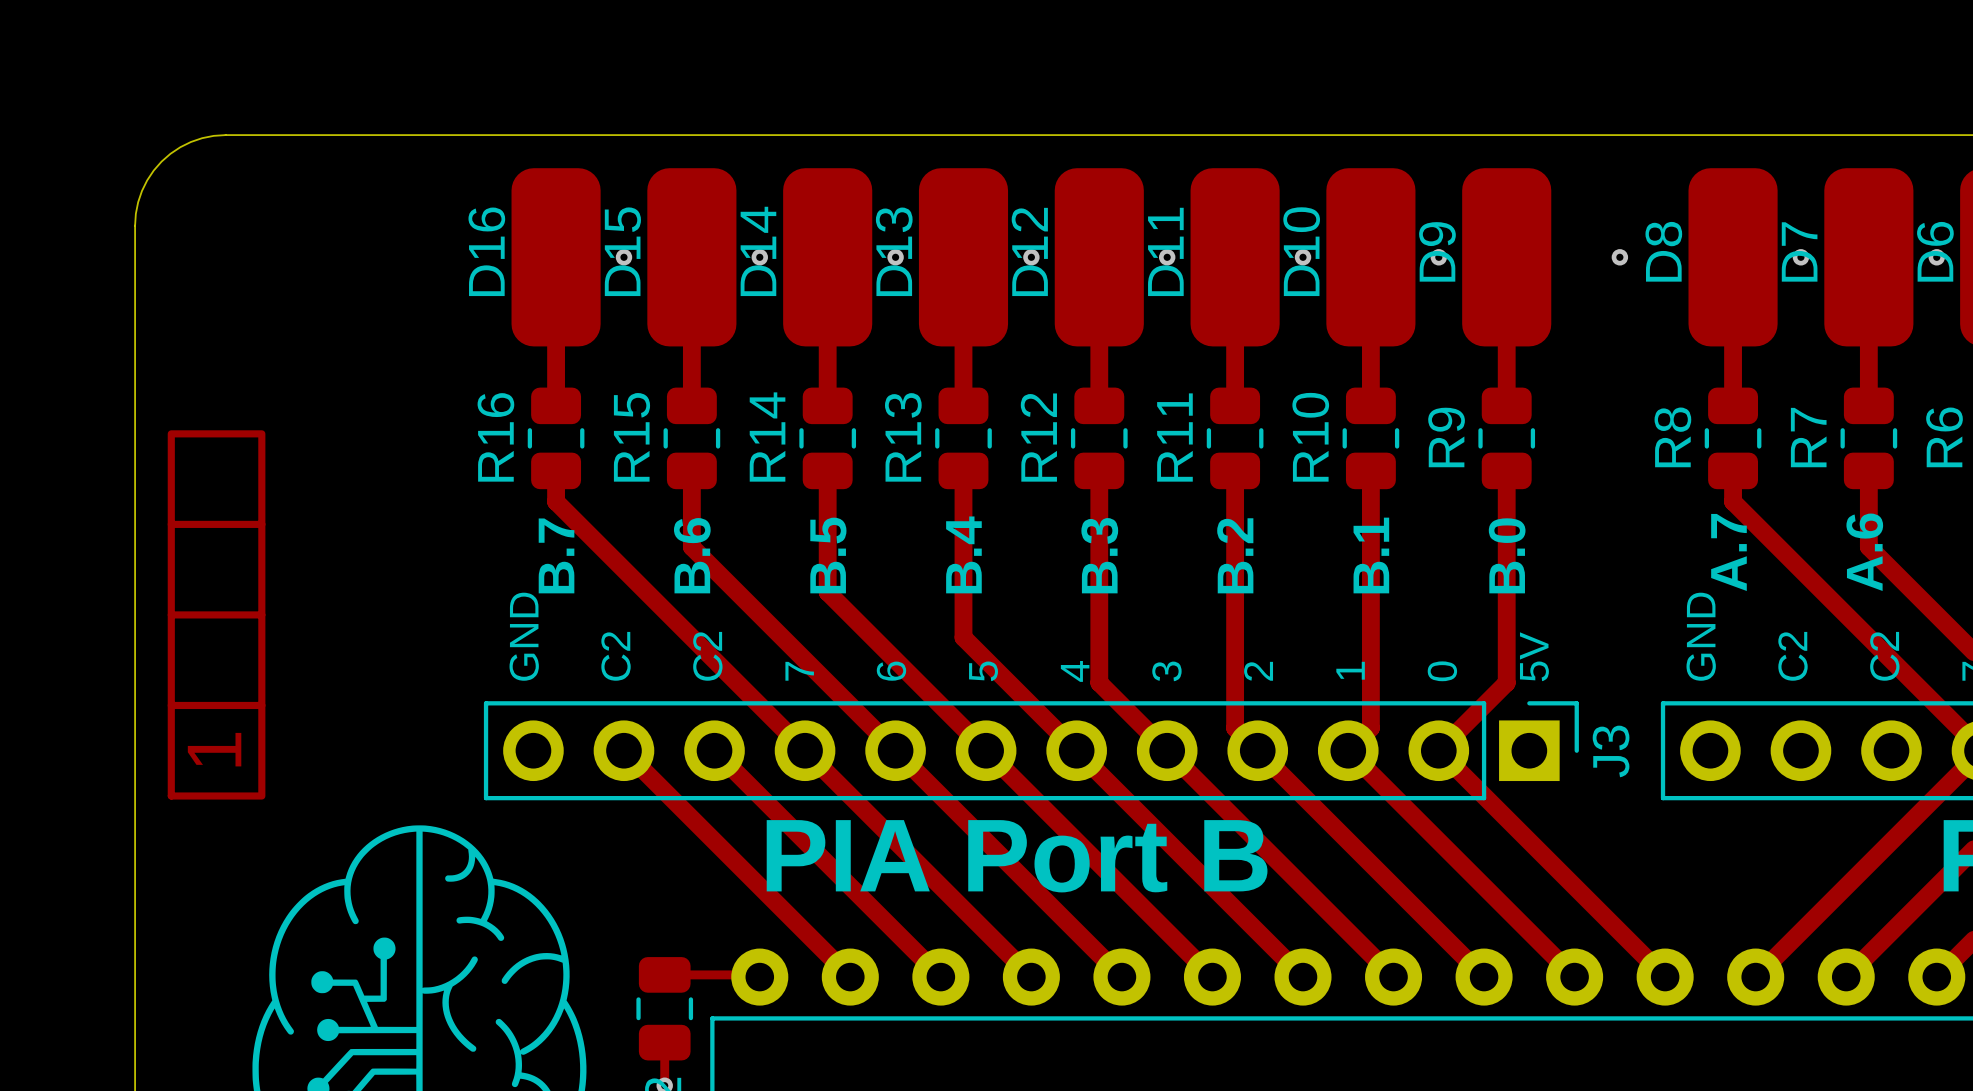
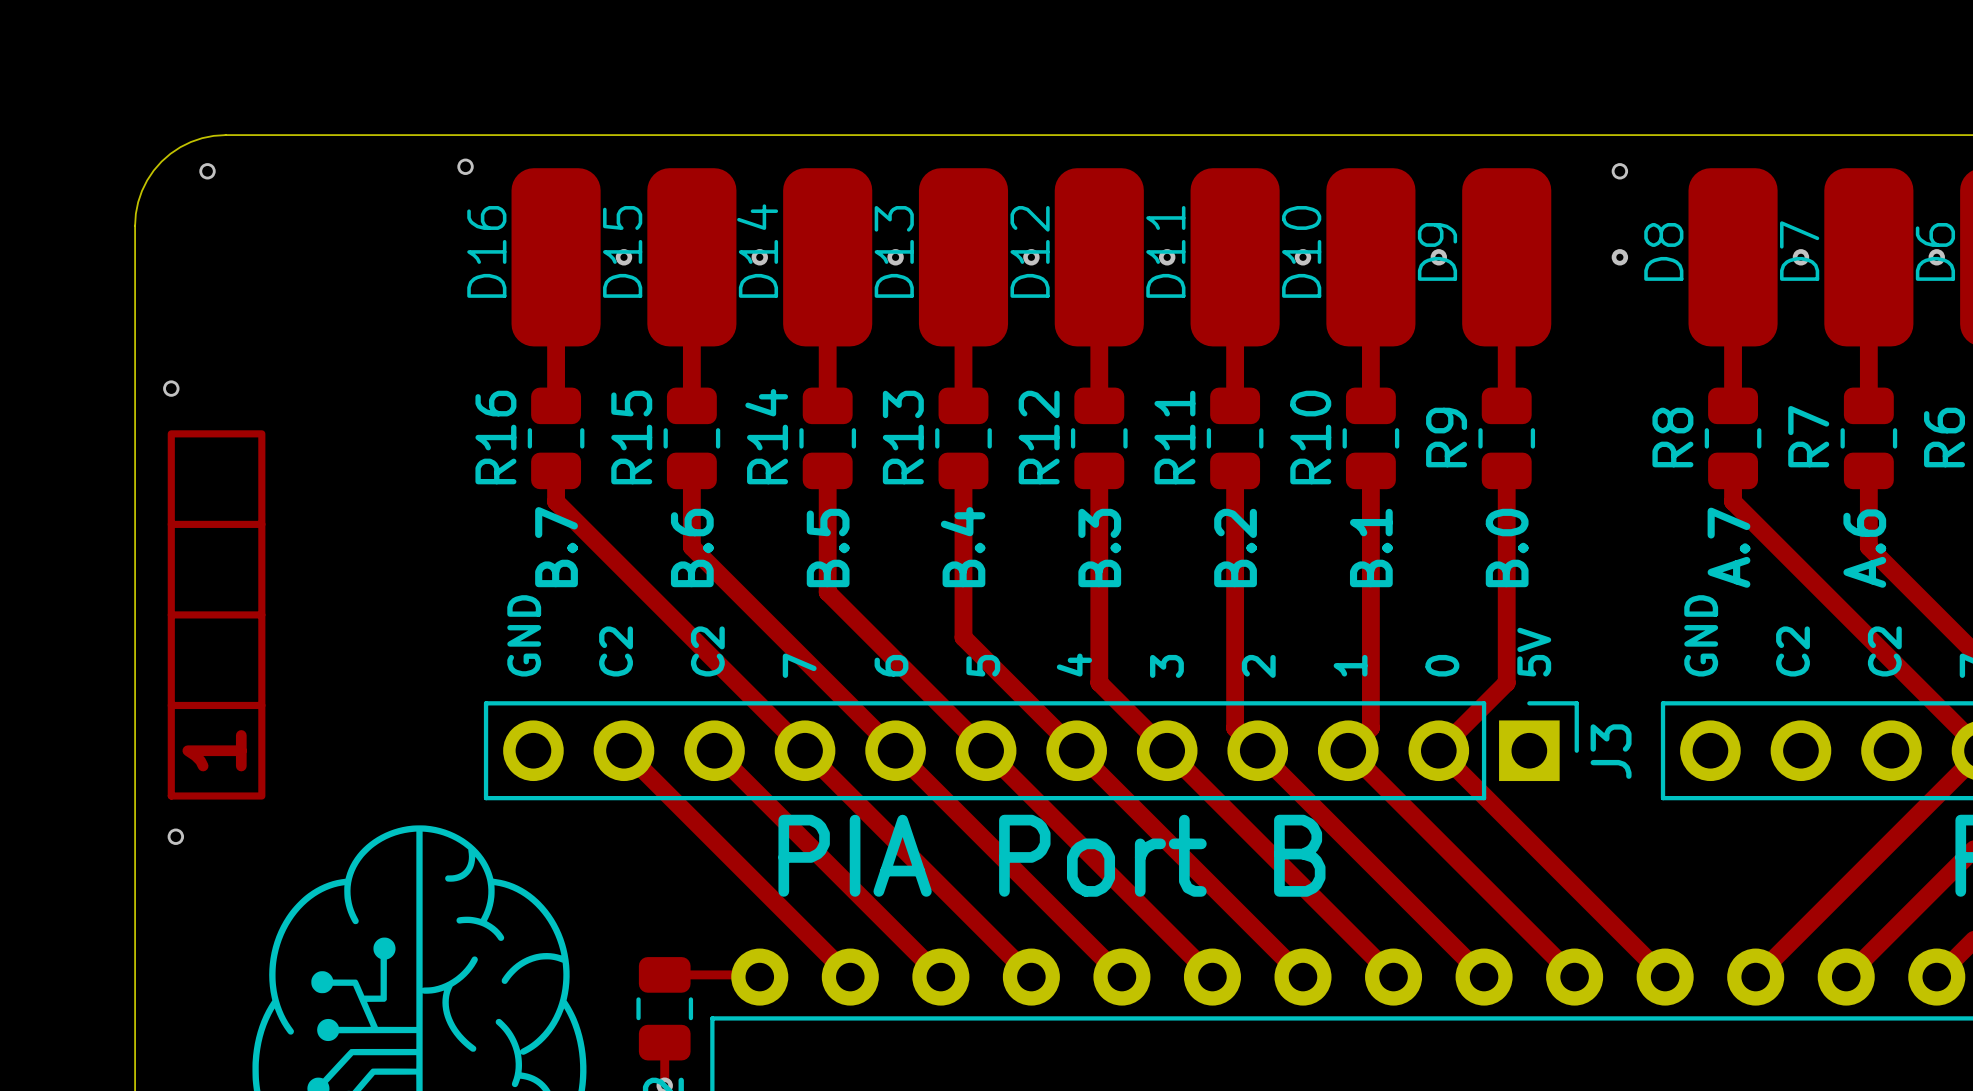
via: none -> (465, 166)
via: none -> (207, 171)
via: none -> (1619, 171)
via: none -> (171, 388)
via: none -> (175, 836)

